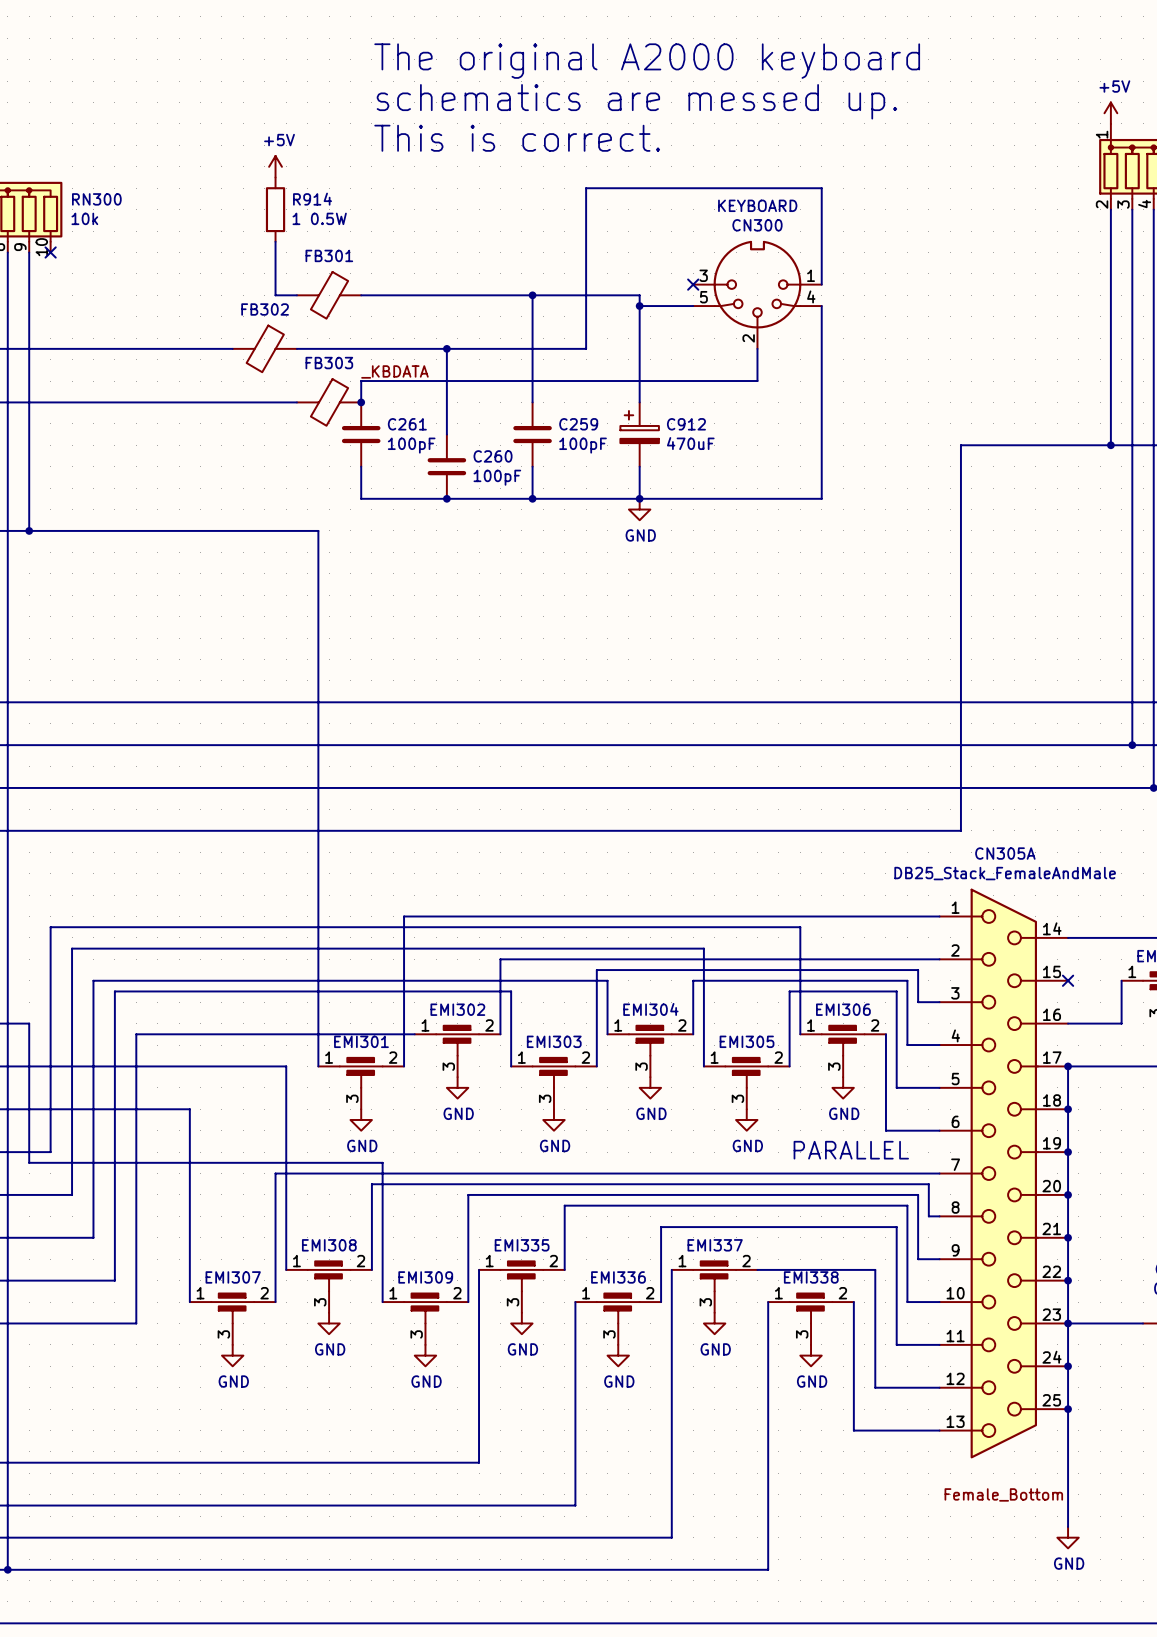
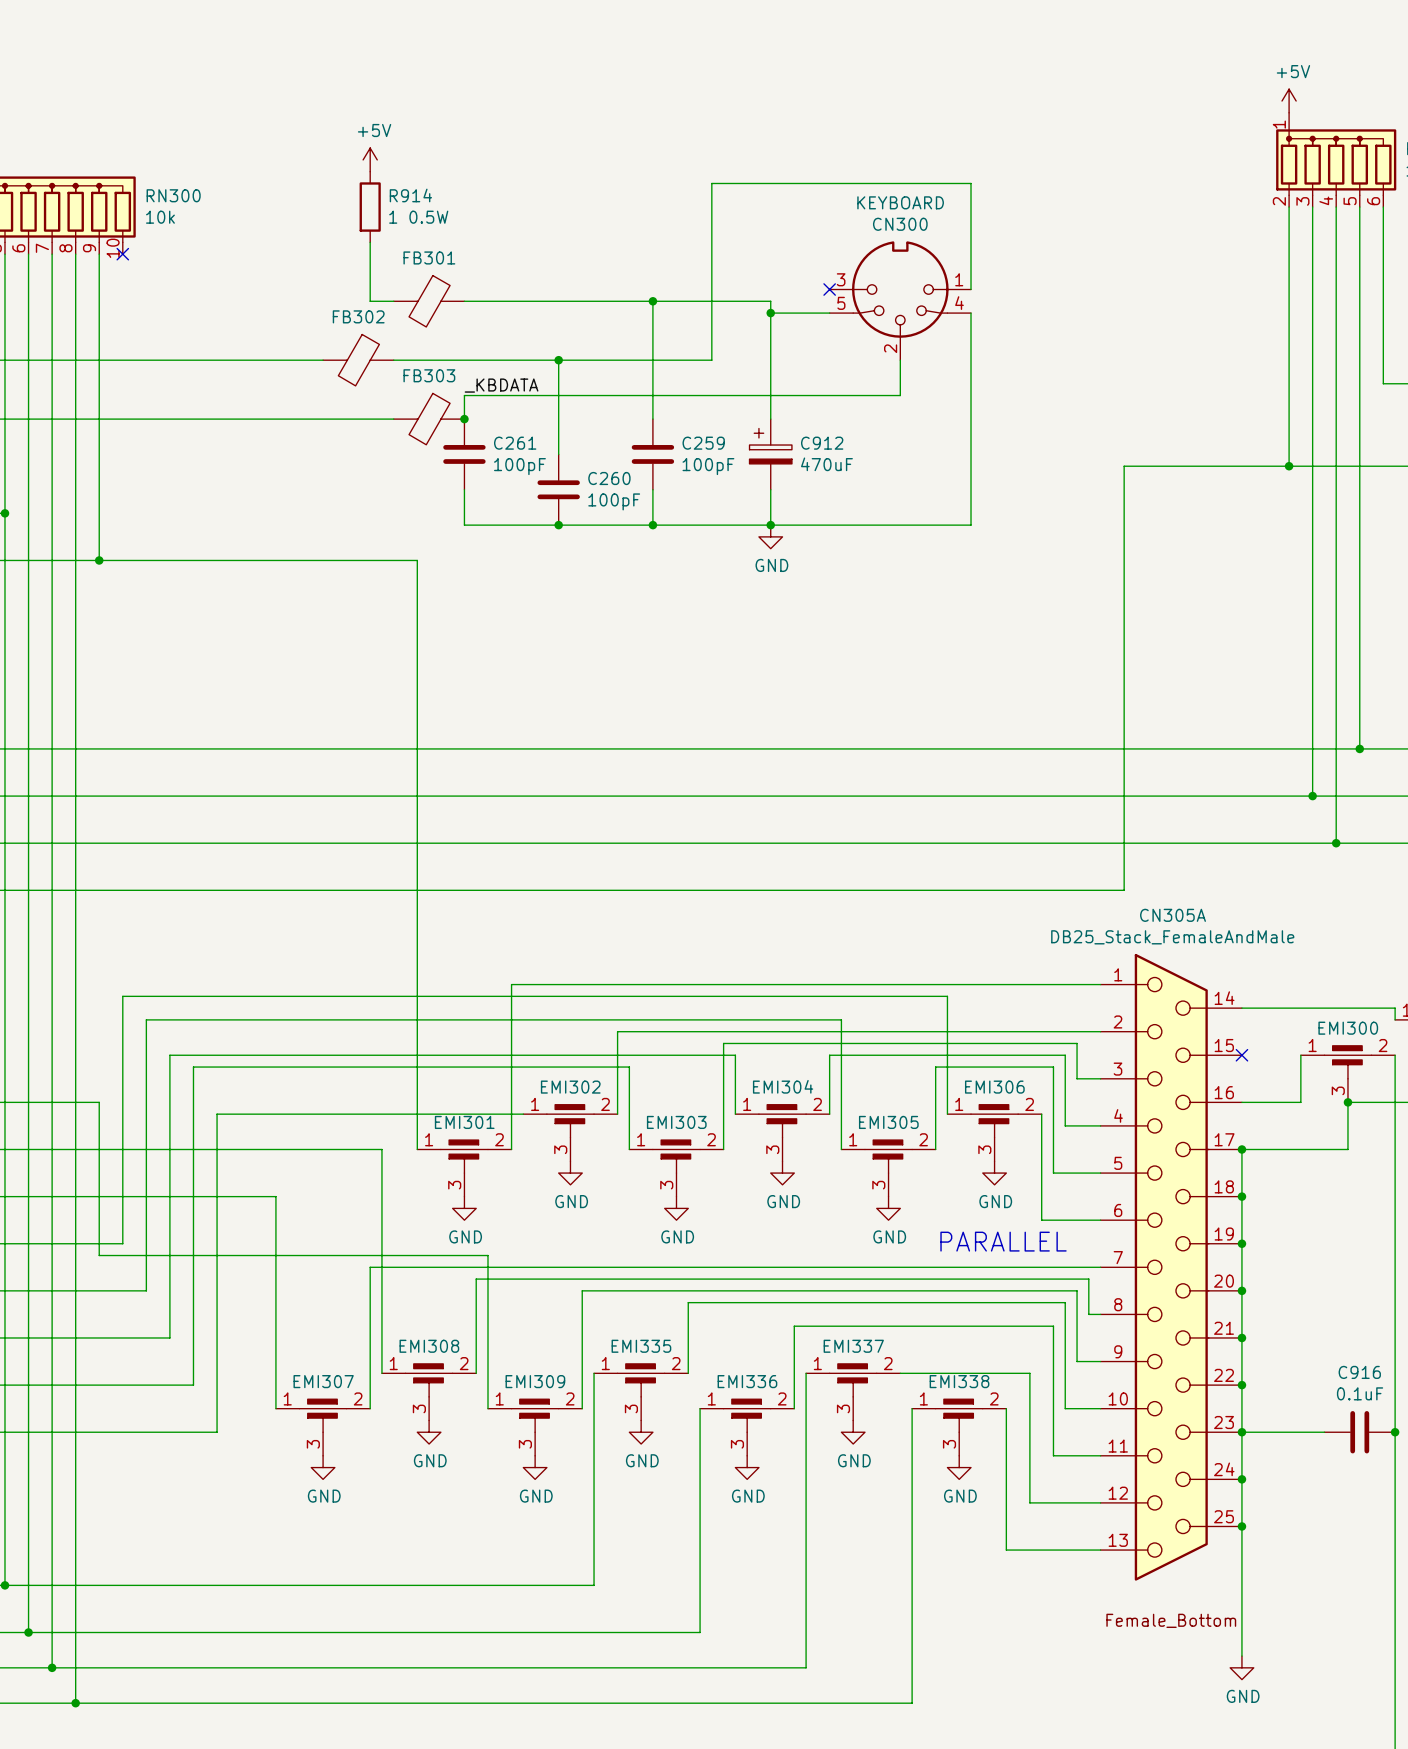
text: The original A2000 keyboard (647, 61) -> none
text: schematics are messed up. (636, 101) -> none
text: This is correct. (517, 138) -> none

